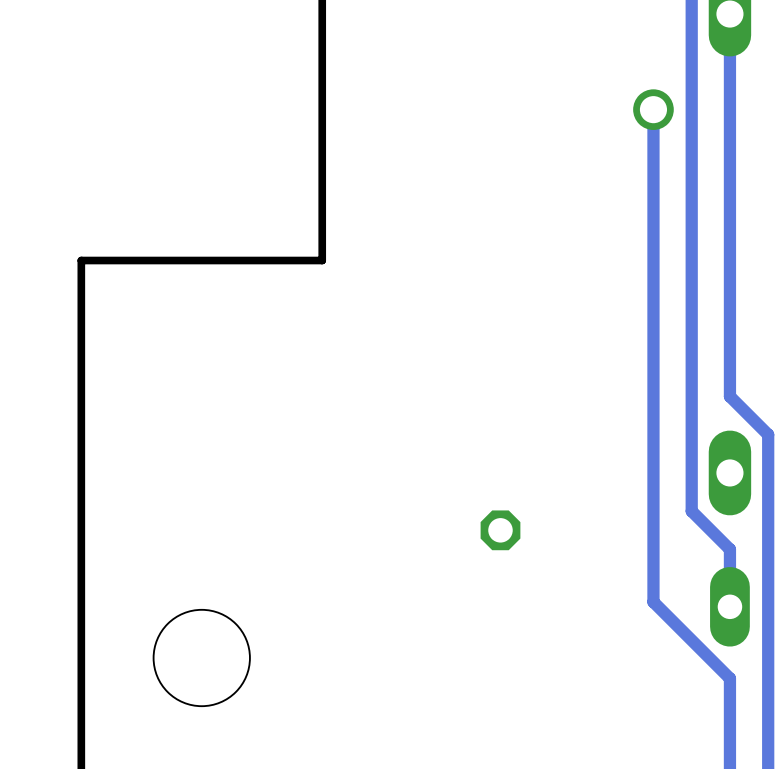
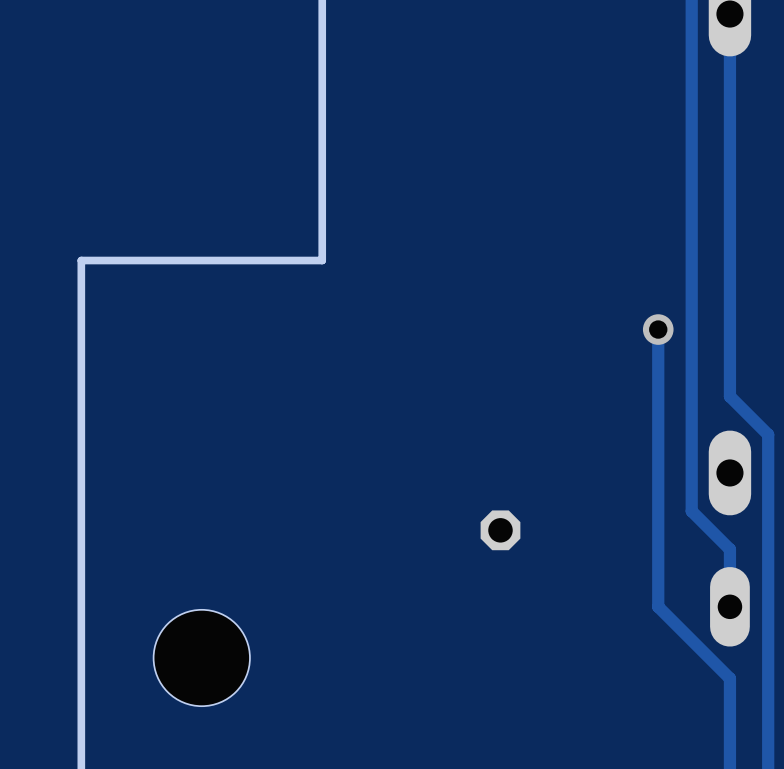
track: (653, 109) (653, 602) (658, 606) -> (658, 329) (658, 606)
via: (653, 109) -> none
via: none -> (658, 329)

